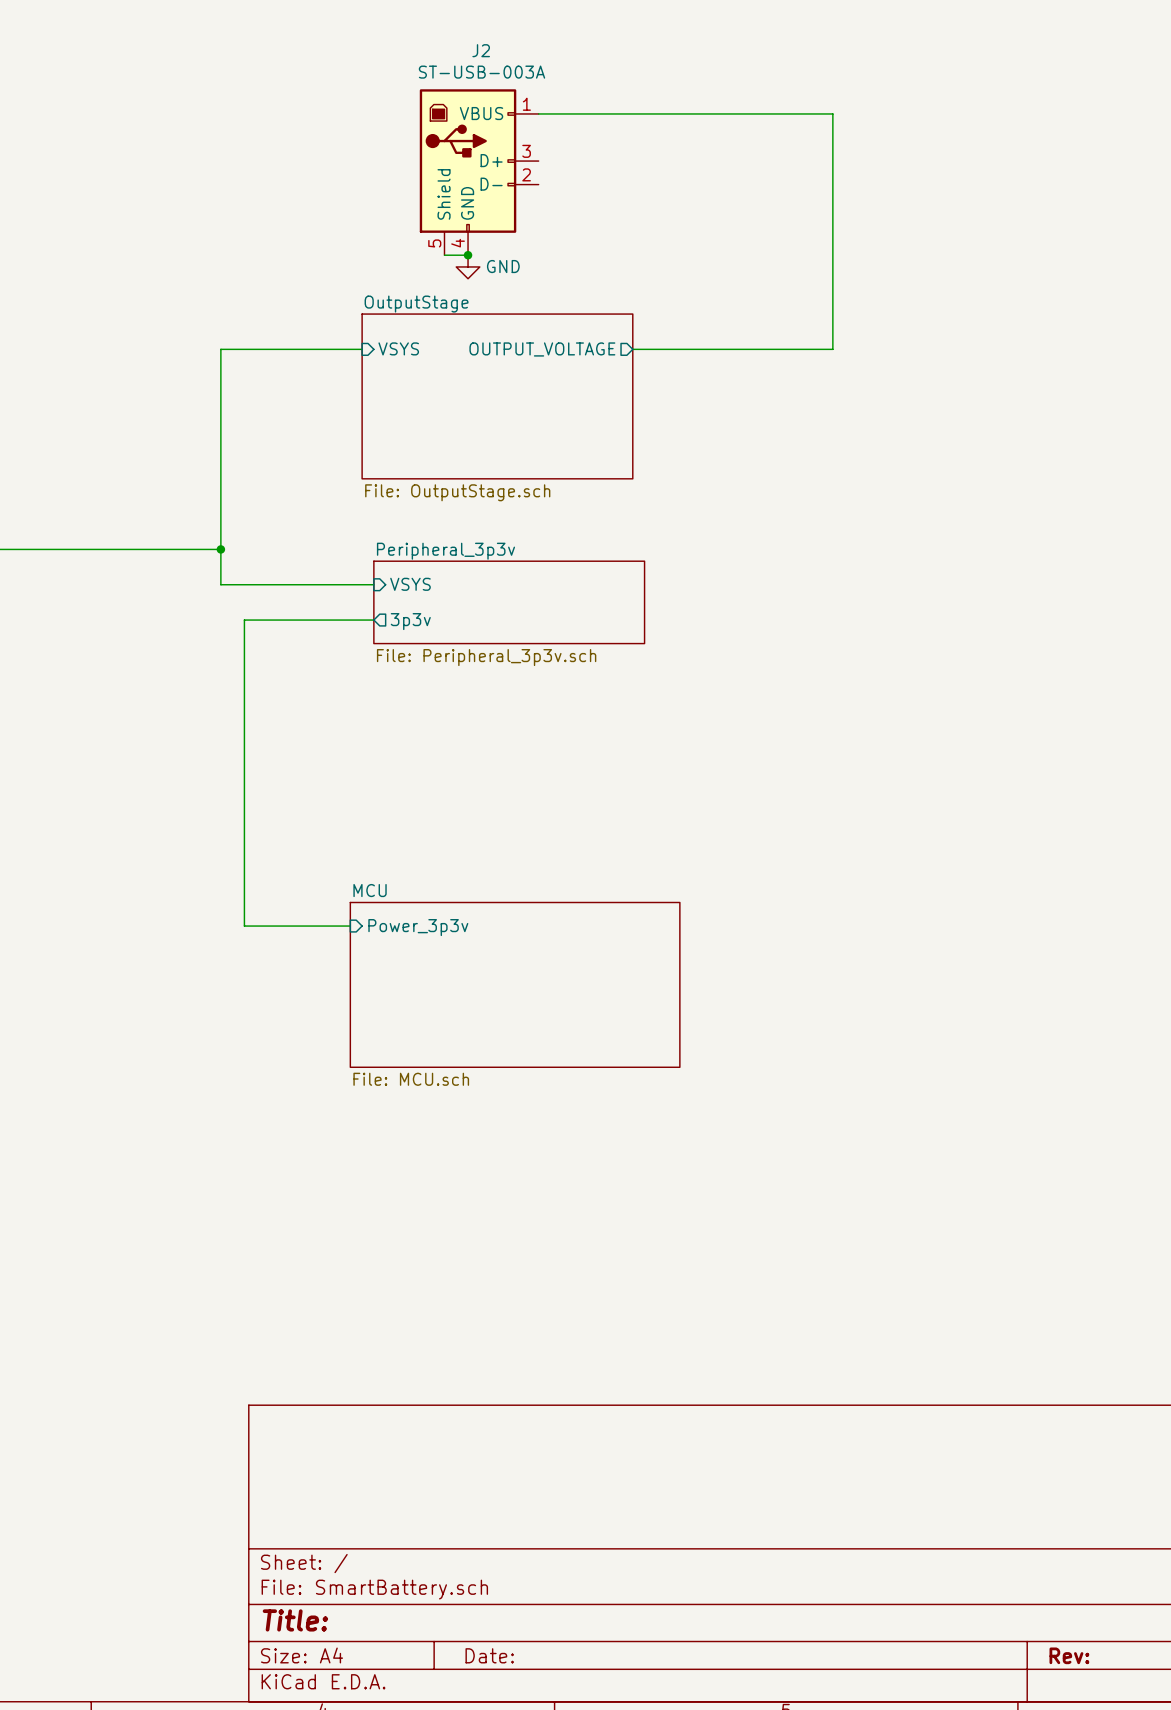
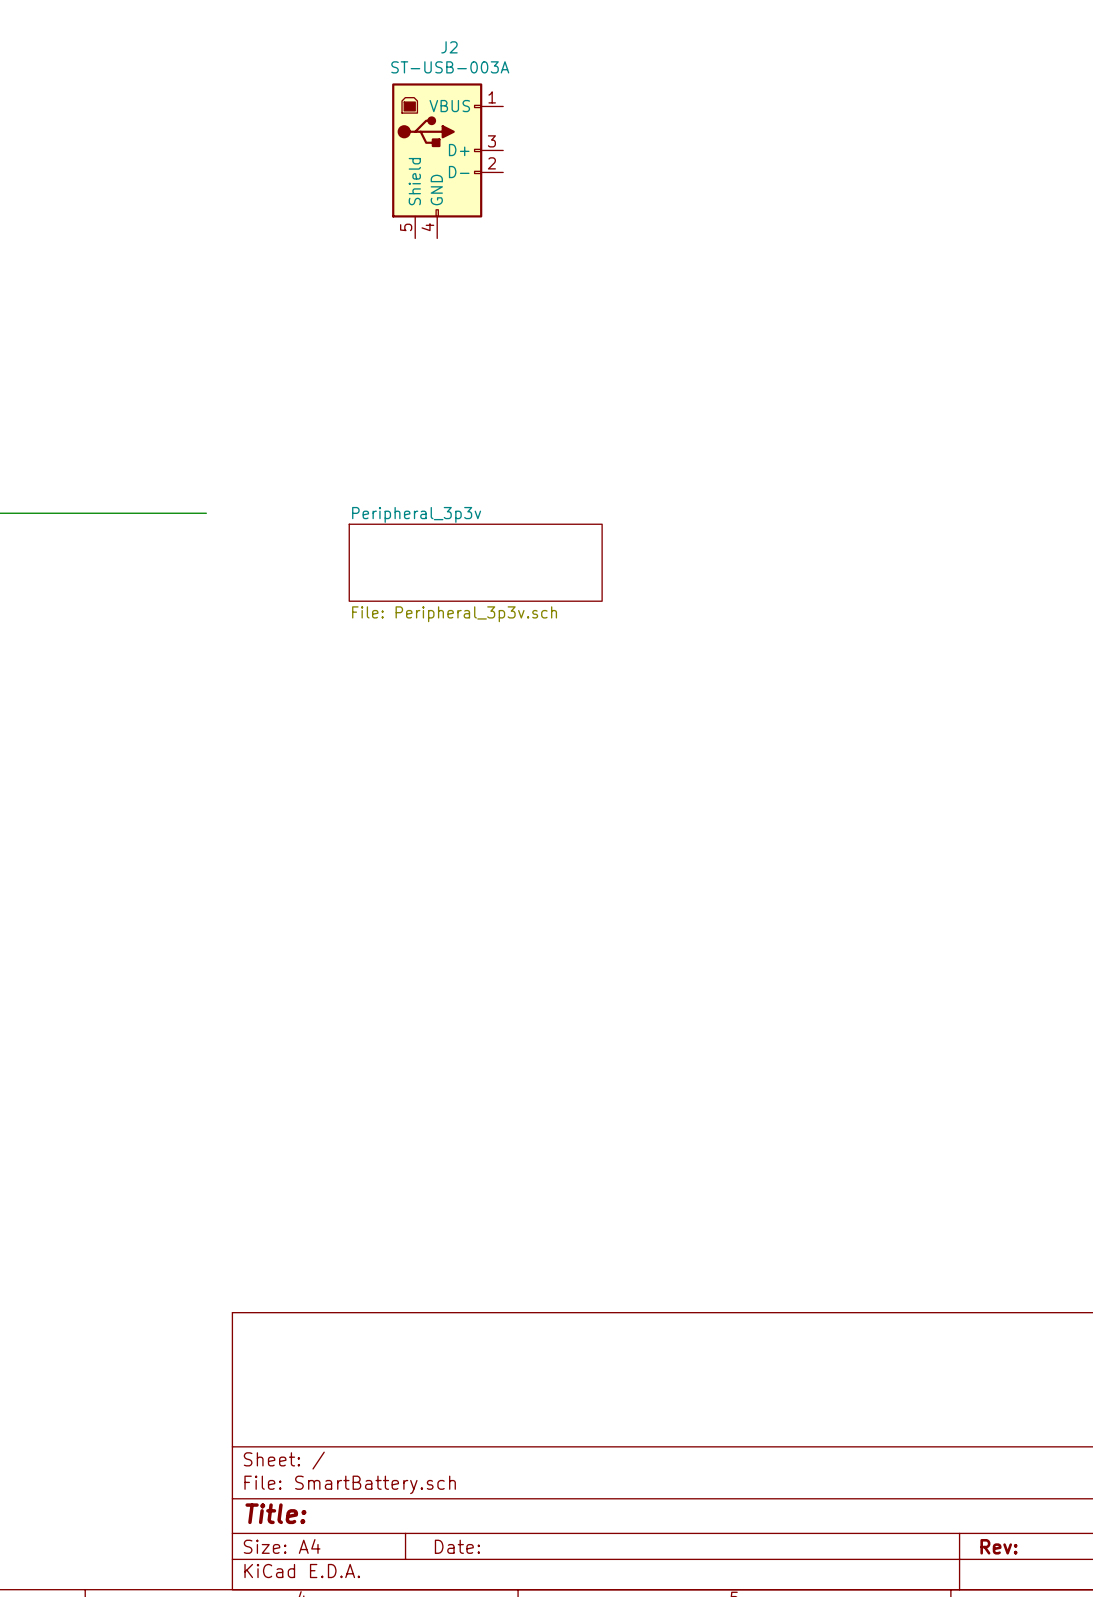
wire: (538, 113) (832, 113) (832, 349) (632, 349) -> none
wire: (444, 255) (468, 255) -> none
junction: (468, 255) -> none
power symbol: GND (468, 266) -> none
sheet pin: VSYS (398, 348) -> none
wire: (362, 349) (220, 349) (220, 584) (373, 584) -> none
sheet pin: OUTPUT_VOLTAGE (542, 349) -> none
sheet OutputStage: File: OutputStage.sch (497, 396) -> none
junction: (220, 549) -> none
sheet pin: VSYS (410, 584) -> none
wire: (373, 620) (244, 620) (244, 926) (350, 926) -> none
sheet pin: 3p3v (410, 621) -> none
sheet pin: Power_3p3v (418, 927) -> none
sheet MCU: File: MCU.sch (515, 984) -> none

